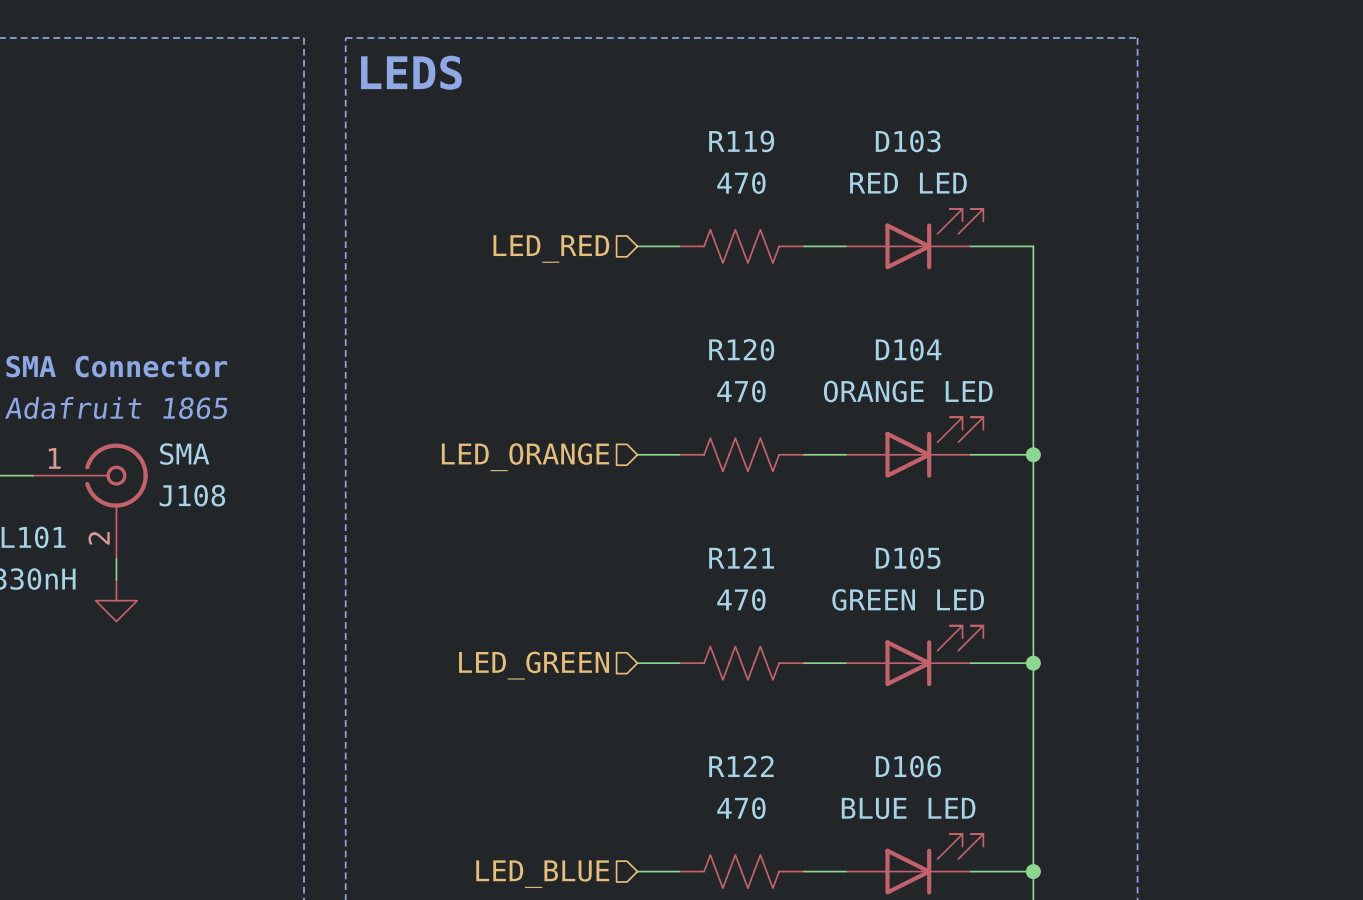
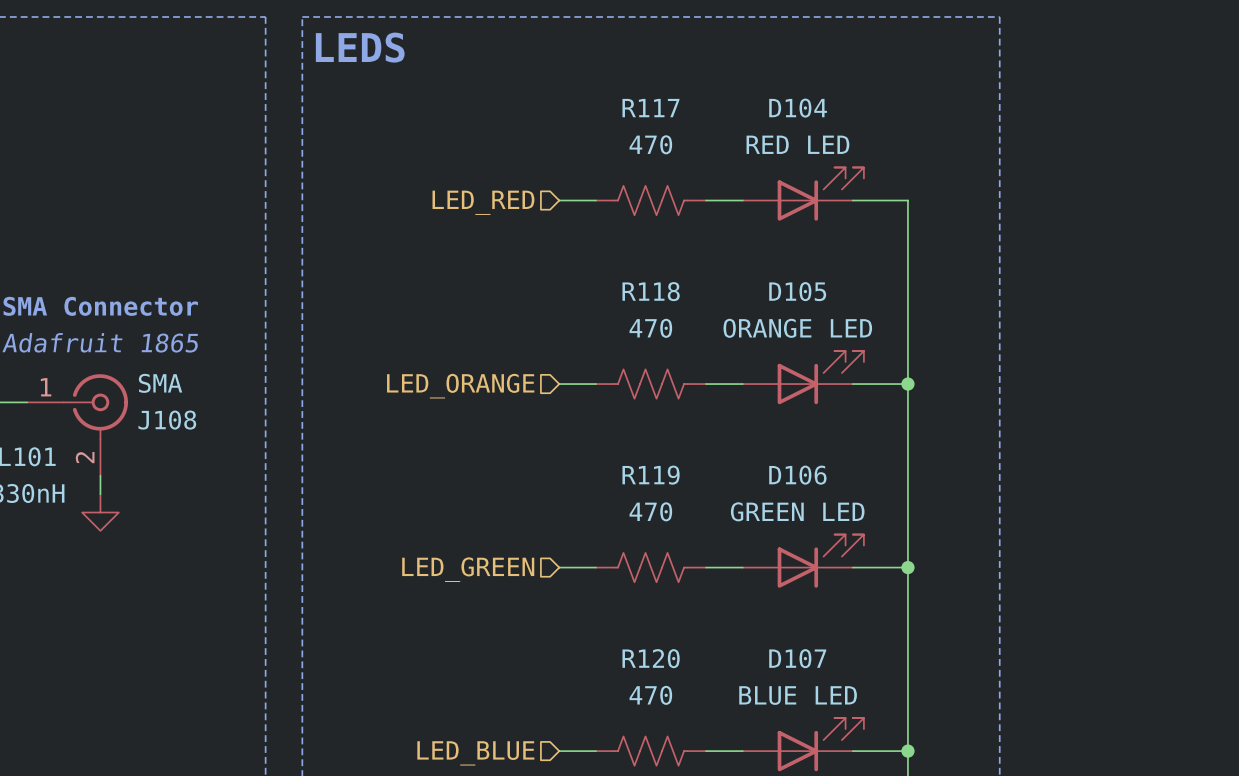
R119 name: R119 (741, 141) -> R117 (650, 108)
D103 name: D103 (908, 141) -> D104 (798, 108)
R120 name: R120 (741, 349) -> R118 (651, 291)
D104 name: D104 (908, 349) -> D105 (797, 291)
R121 name: R121 (741, 558) -> R119 (651, 475)
D105 name: D105 (908, 558) -> D106 (797, 475)
R122 name: R122 (741, 766) -> R120 (651, 658)
D106 name: D106 (908, 766) -> D107 (797, 658)

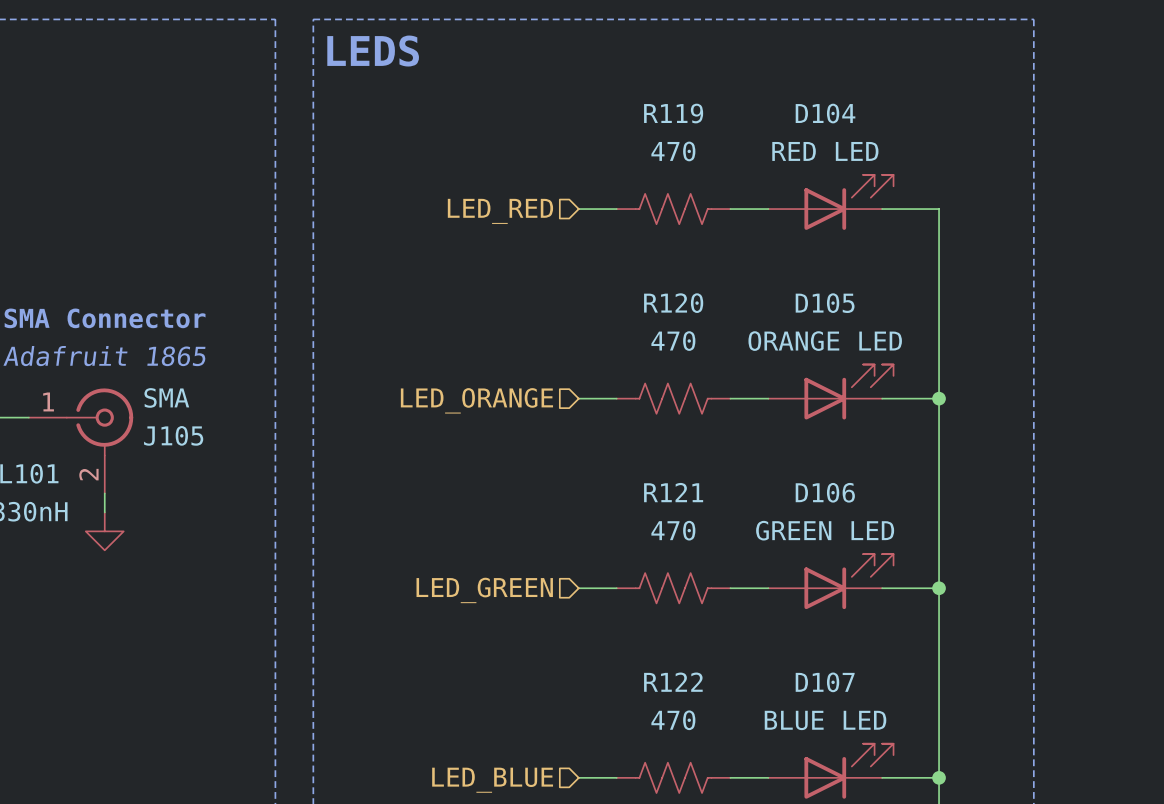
R117 name: R117 (650, 108) -> R119 (673, 113)
R118 name: R118 (651, 291) -> R120 (673, 303)
J108 name: J108 (167, 420) -> J105 (173, 435)
R119 name: R119 (651, 475) -> R121 (673, 492)
R120 name: R120 (651, 658) -> R122 (673, 682)

